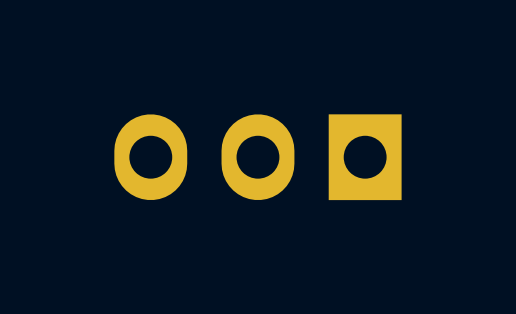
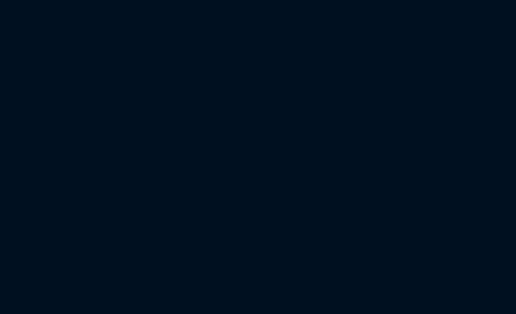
part: (257, 157) -> none

